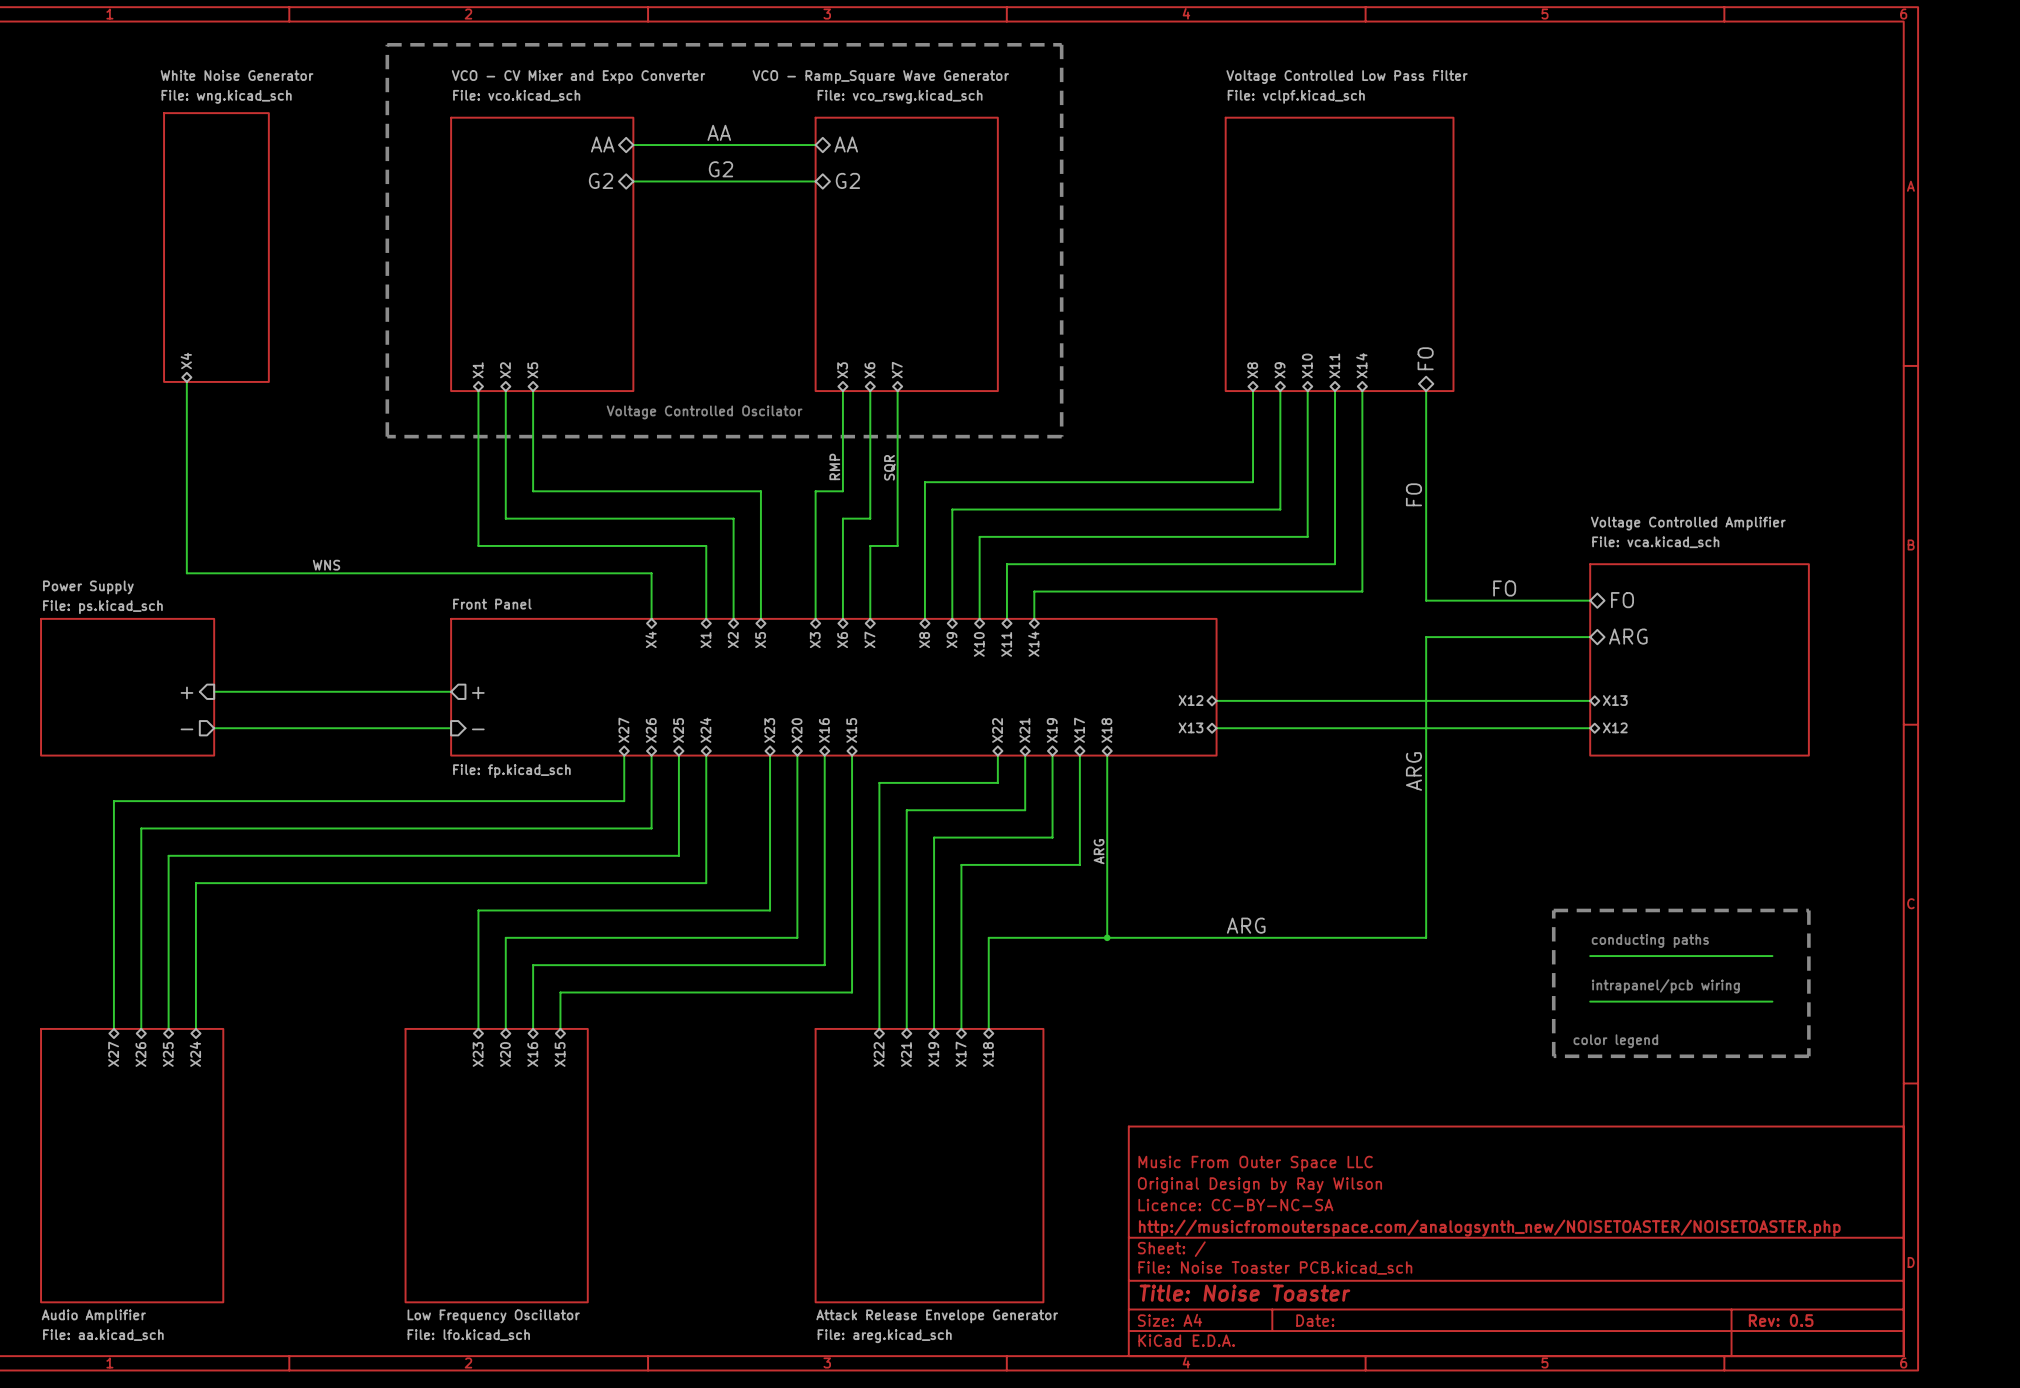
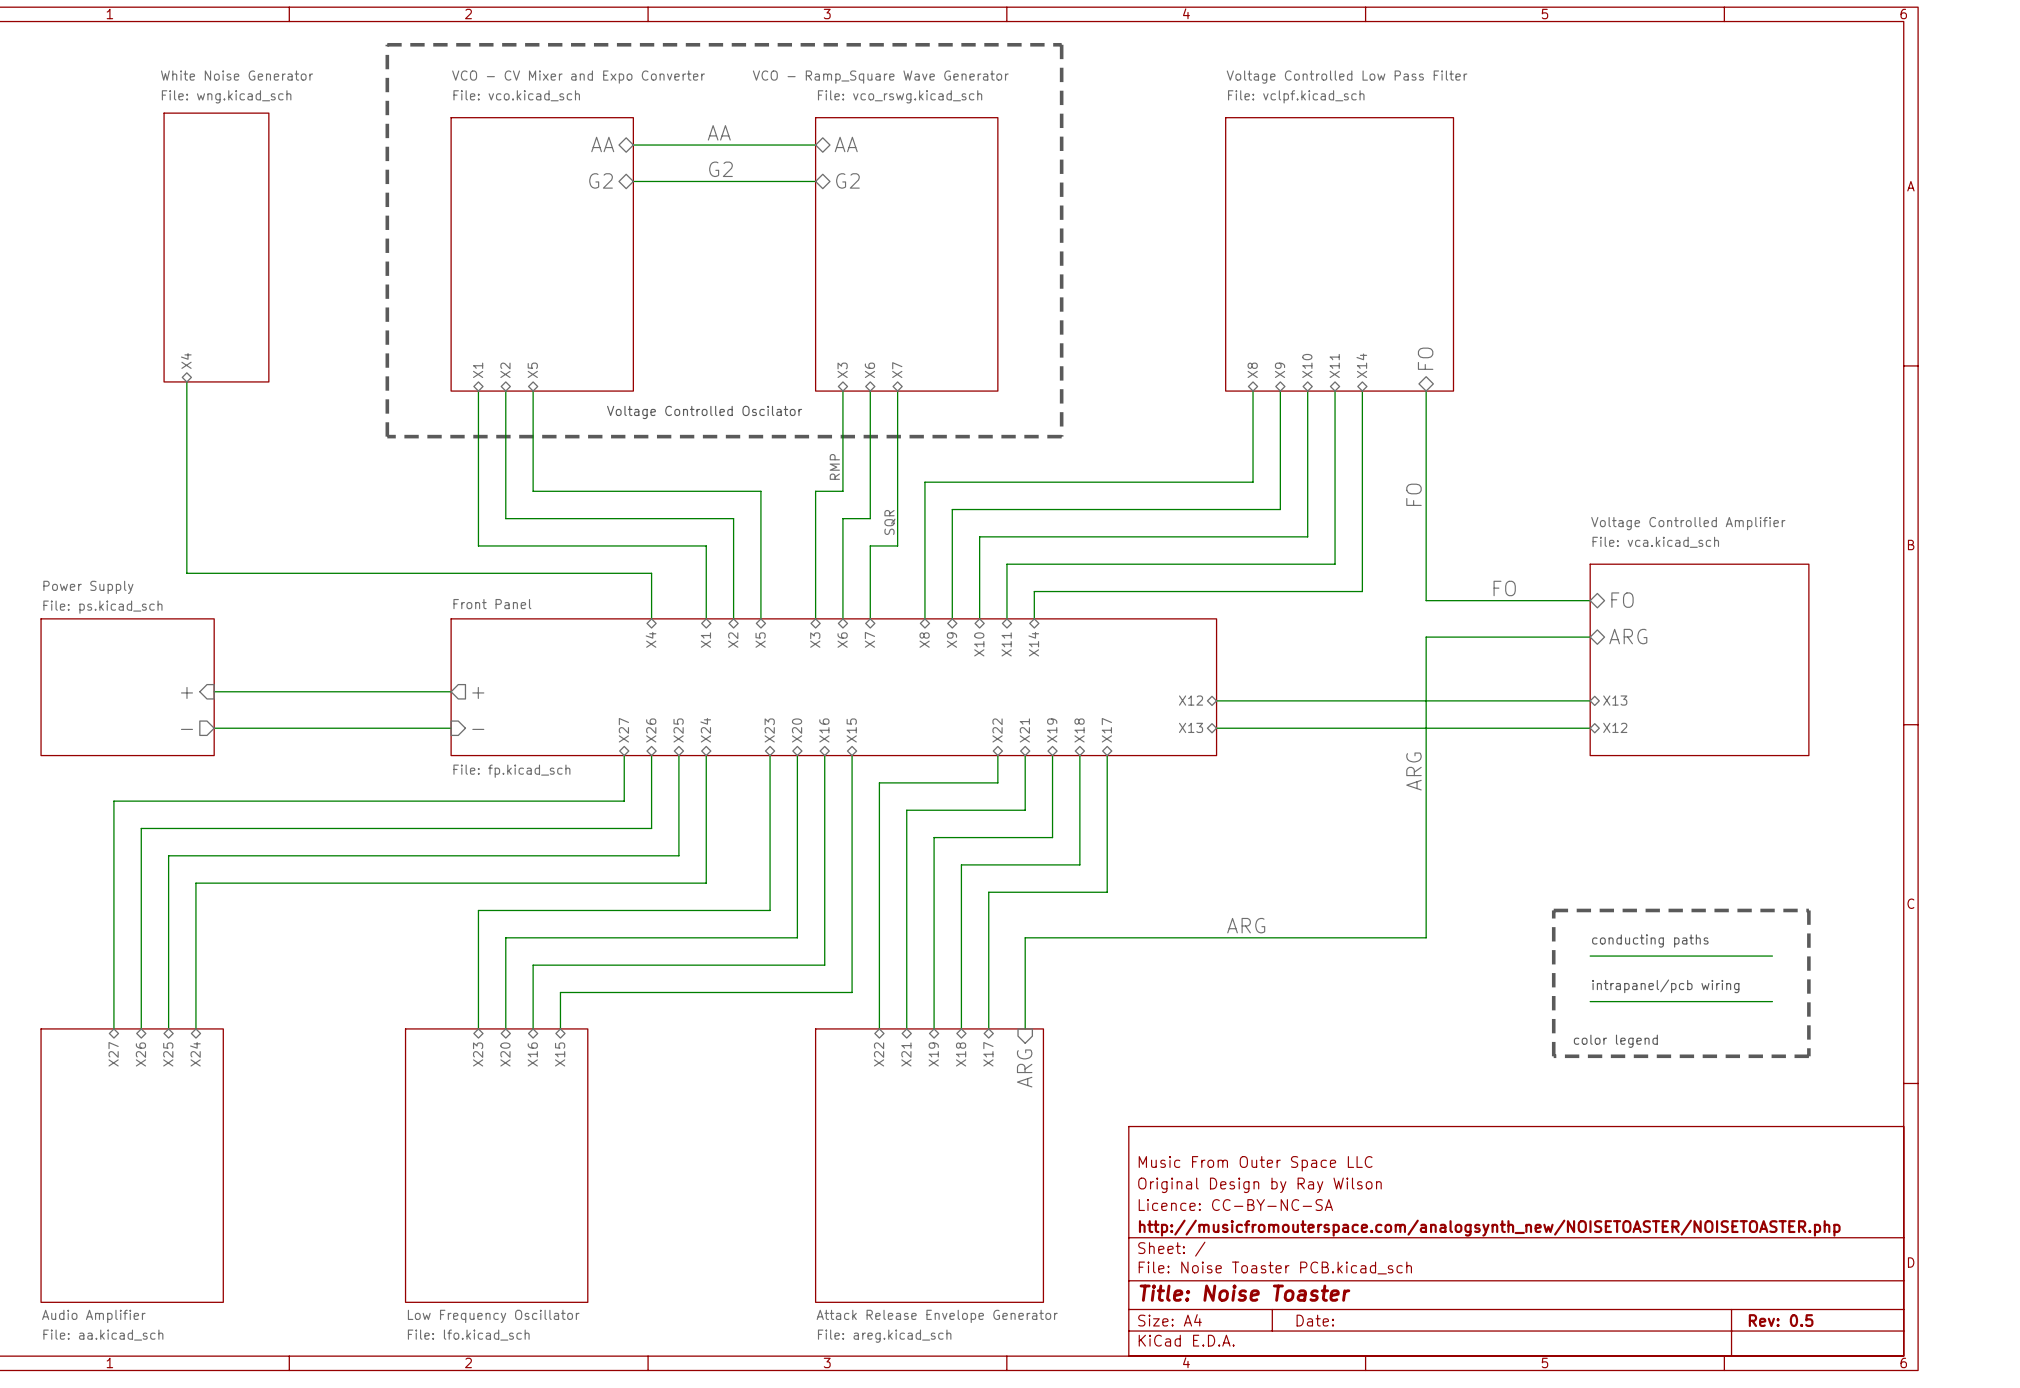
label position: SQR (889, 467) -> SQR (889, 522)
label: WNS (326, 565) -> none
sheet pin: X17 (1079, 730) -> X18 (1079, 730)
sheet pin: X18 (1106, 730) -> X17 (1106, 730)
label: ARG (1099, 851) -> none
wire: (1107, 892) (1107, 937) -> none
wire: (988, 937) (1025, 937) -> (988, 937) (988, 892) (1107, 892)
wire: none -> (1025, 937) (1025, 1028)
junction: (1107, 937) -> none
sheet pin: X17 (961, 1054) -> X18 (961, 1054)
sheet pin: X18 (988, 1054) -> X17 (988, 1054)
sheet pin: none -> ARG (1024, 1068)

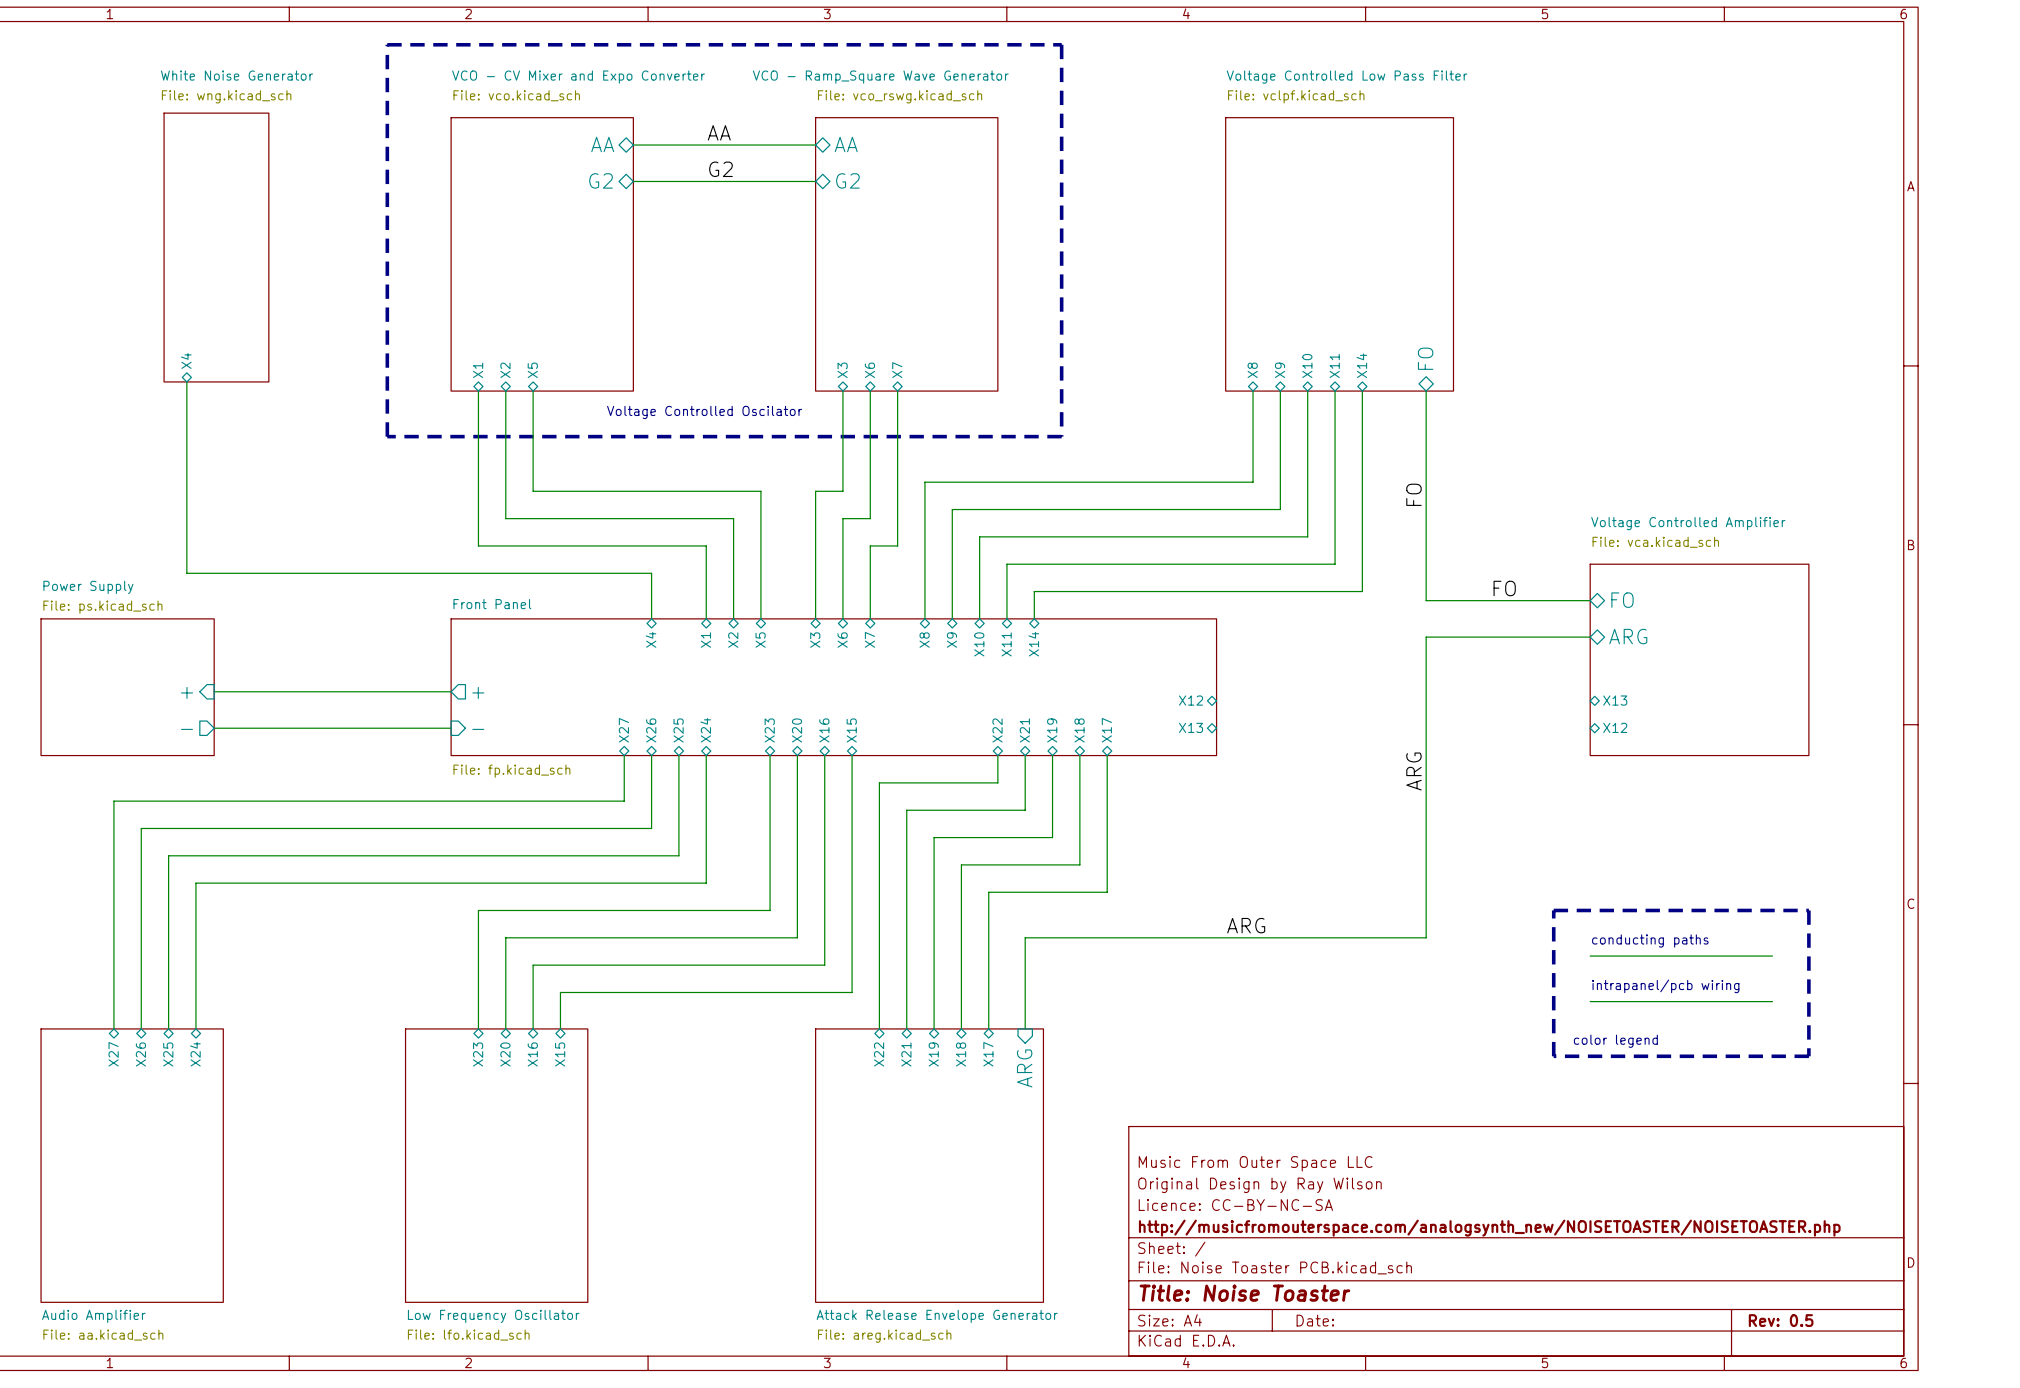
label: RMP (834, 466) -> none
label: SQR (889, 522) -> none
wire: (1216, 700) (1590, 700) -> none
wire: (1216, 728) (1590, 728) -> none

